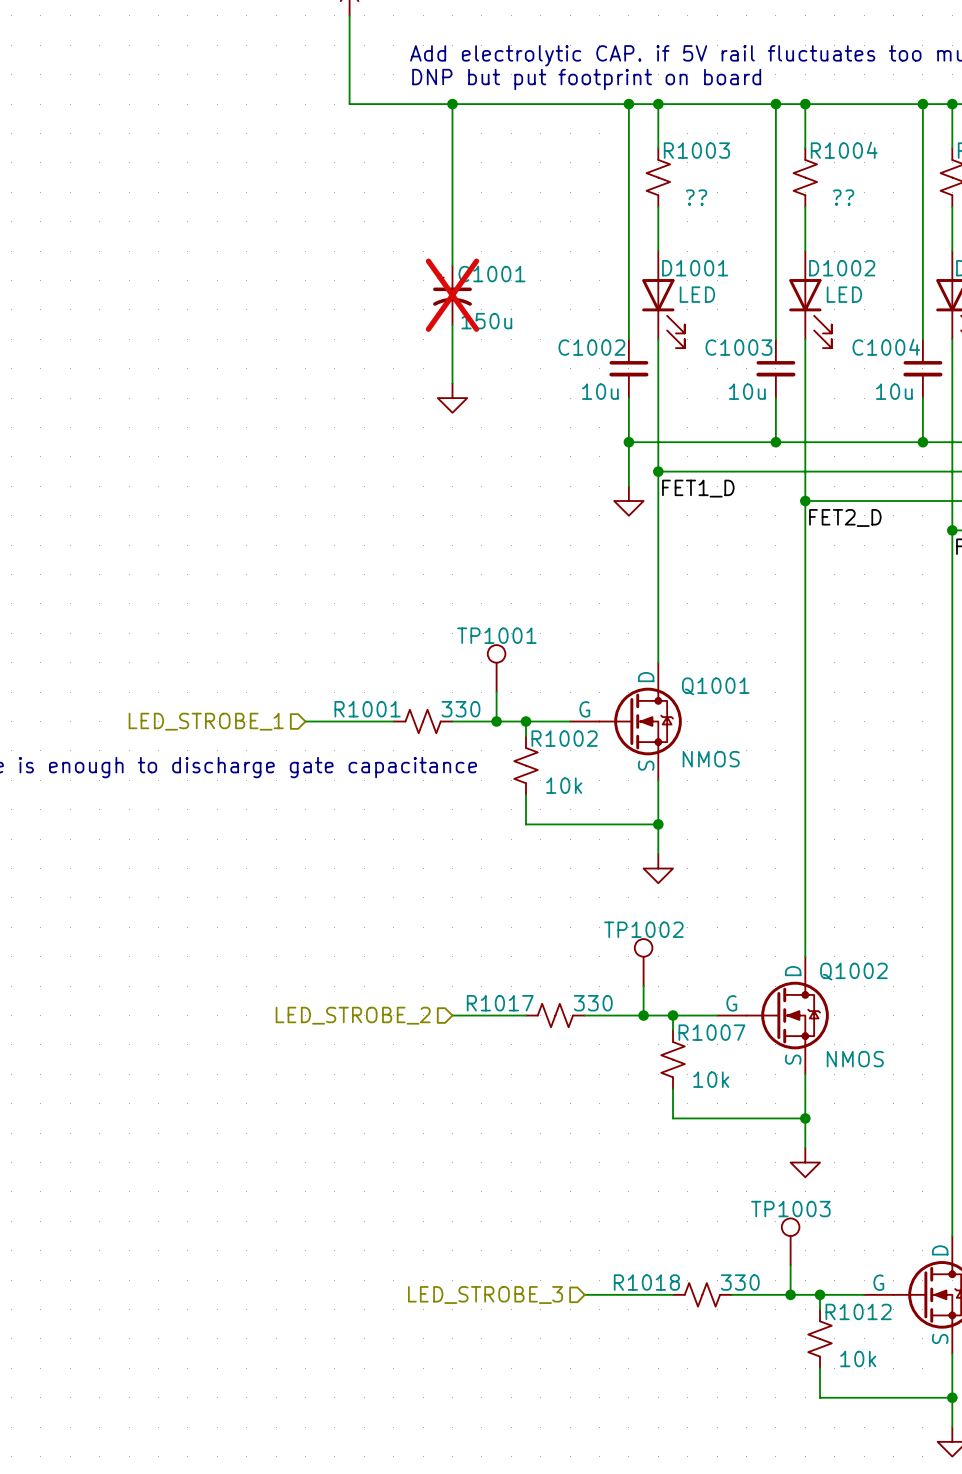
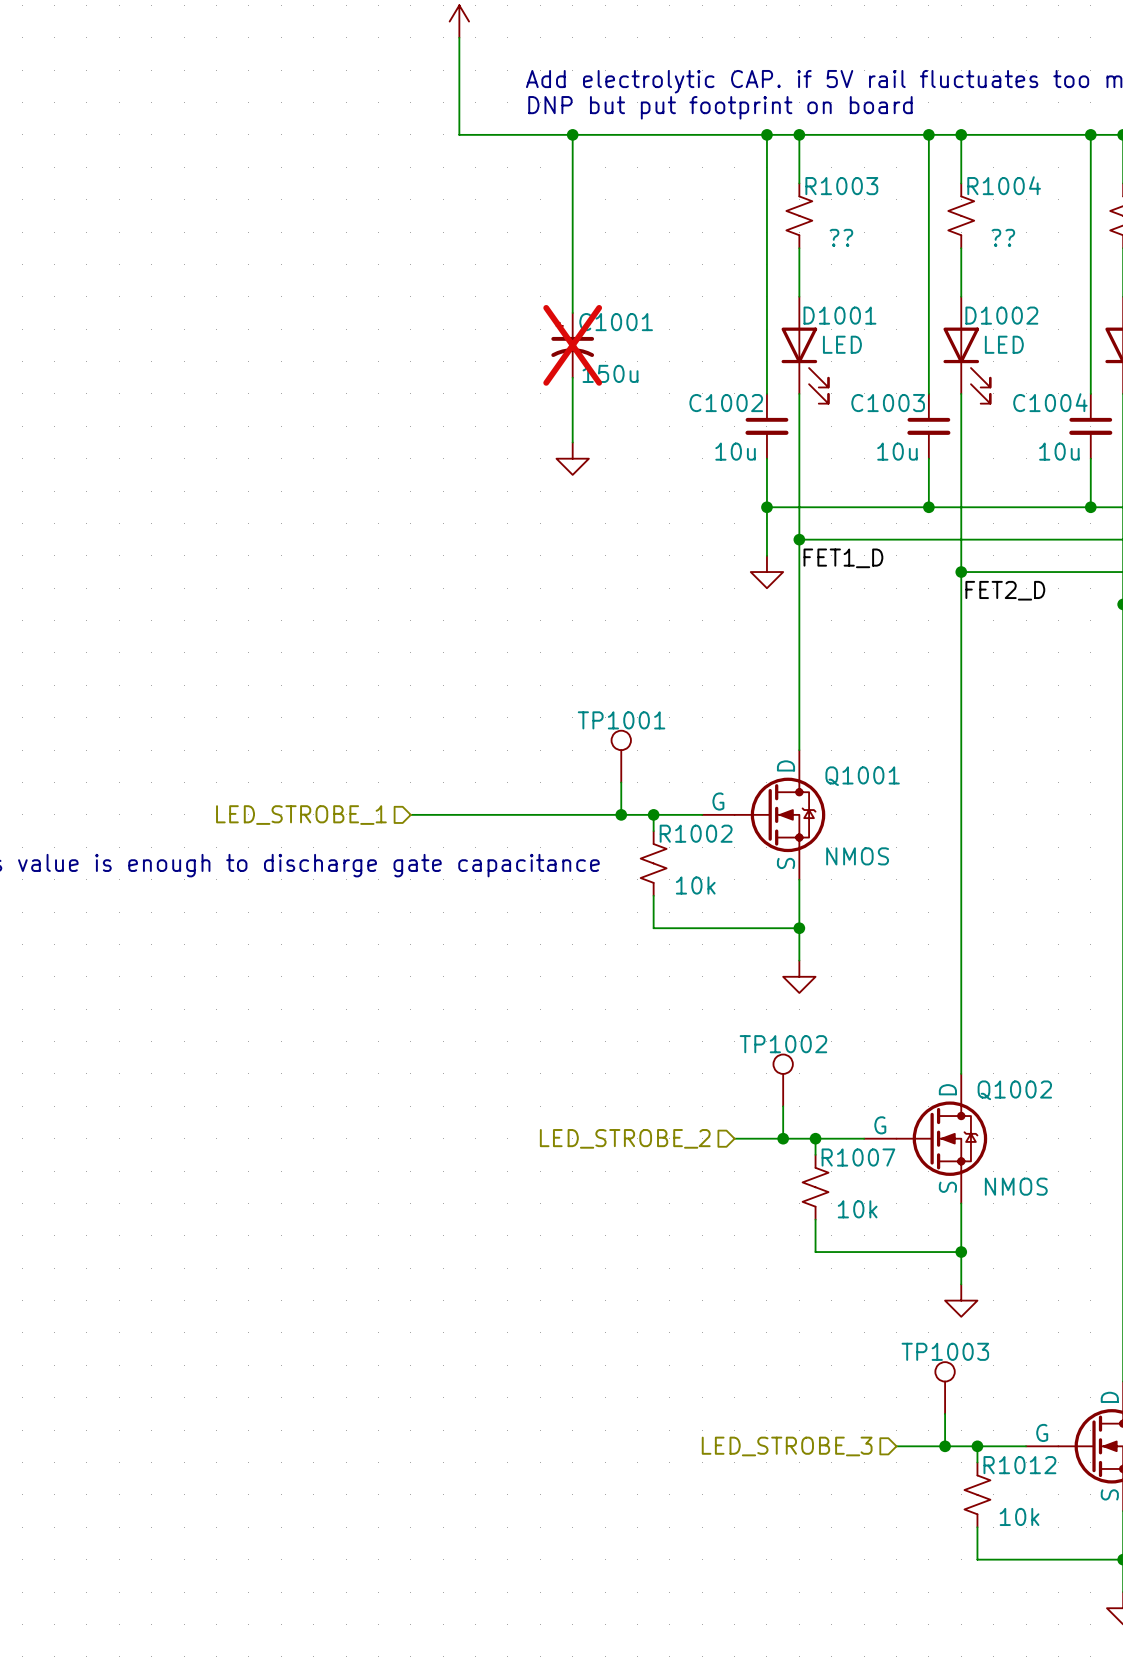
R1001: 330 (423, 721) -> none
hierarchical label position: LED_STROBE_2 (353, 1015) -> LED_STROBE_2 (625, 1138)
wire: (452, 1015) (526, 1015) -> none
R1017: 330 (555, 1015) -> none
wire: (584, 1015) (599, 1015) -> none
wire: (584, 1294) (673, 1294) -> none
R1018: 330 (702, 1294) -> none
wire: (731, 1294) (746, 1294) -> none
hierarchical label position: LED_STROBE_3 (485, 1295) -> LED_STROBE_3 (787, 1446)

